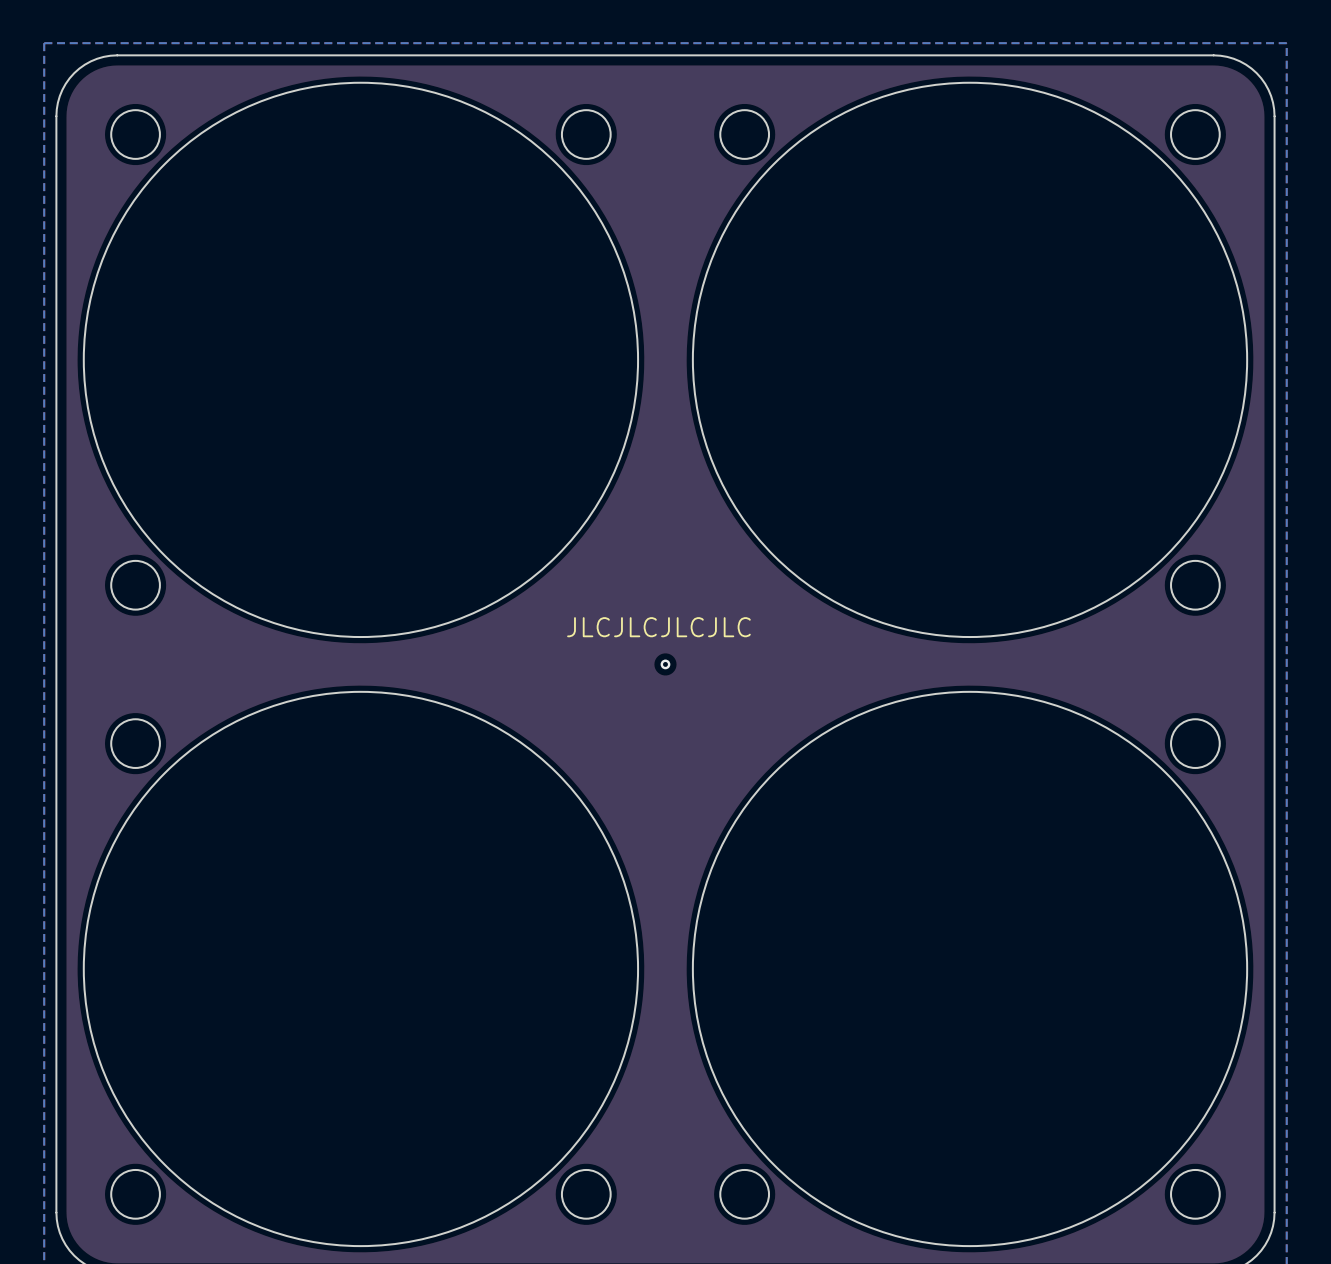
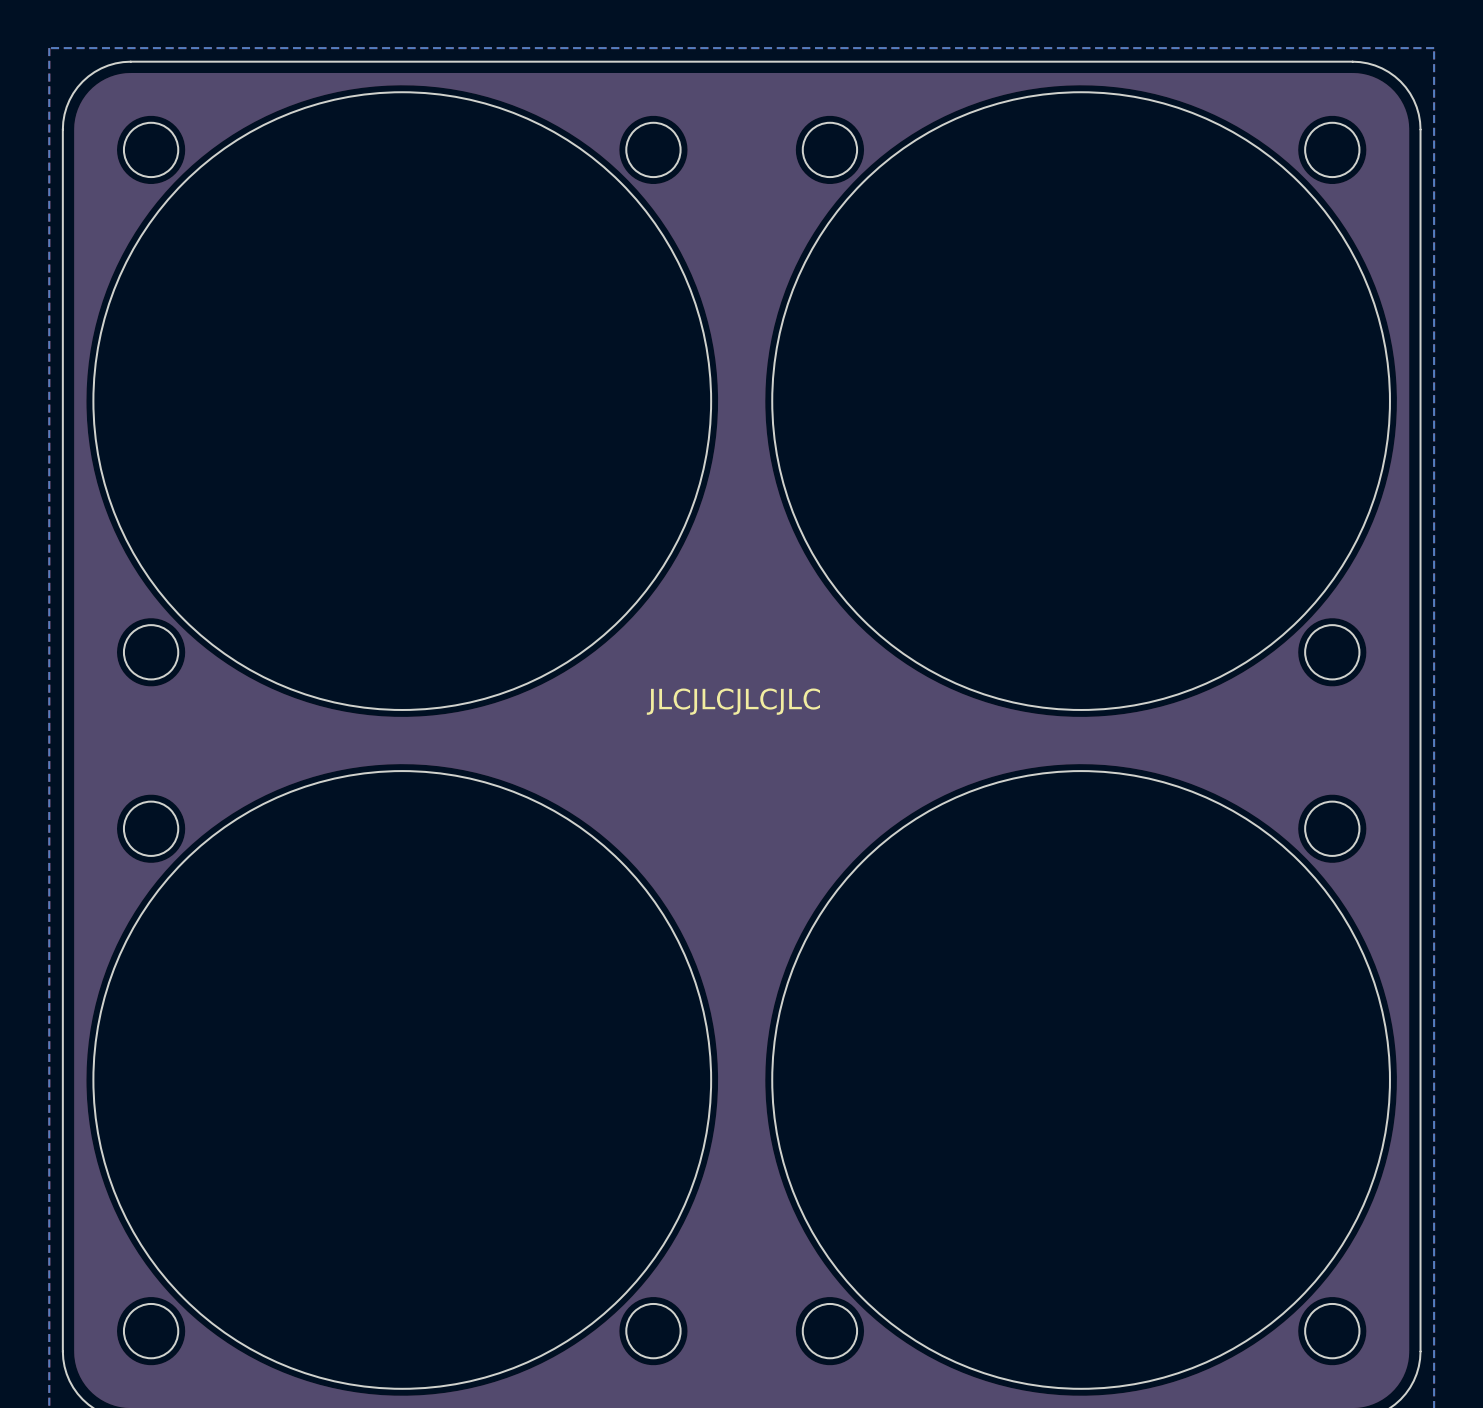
via: (665, 664) -> none

